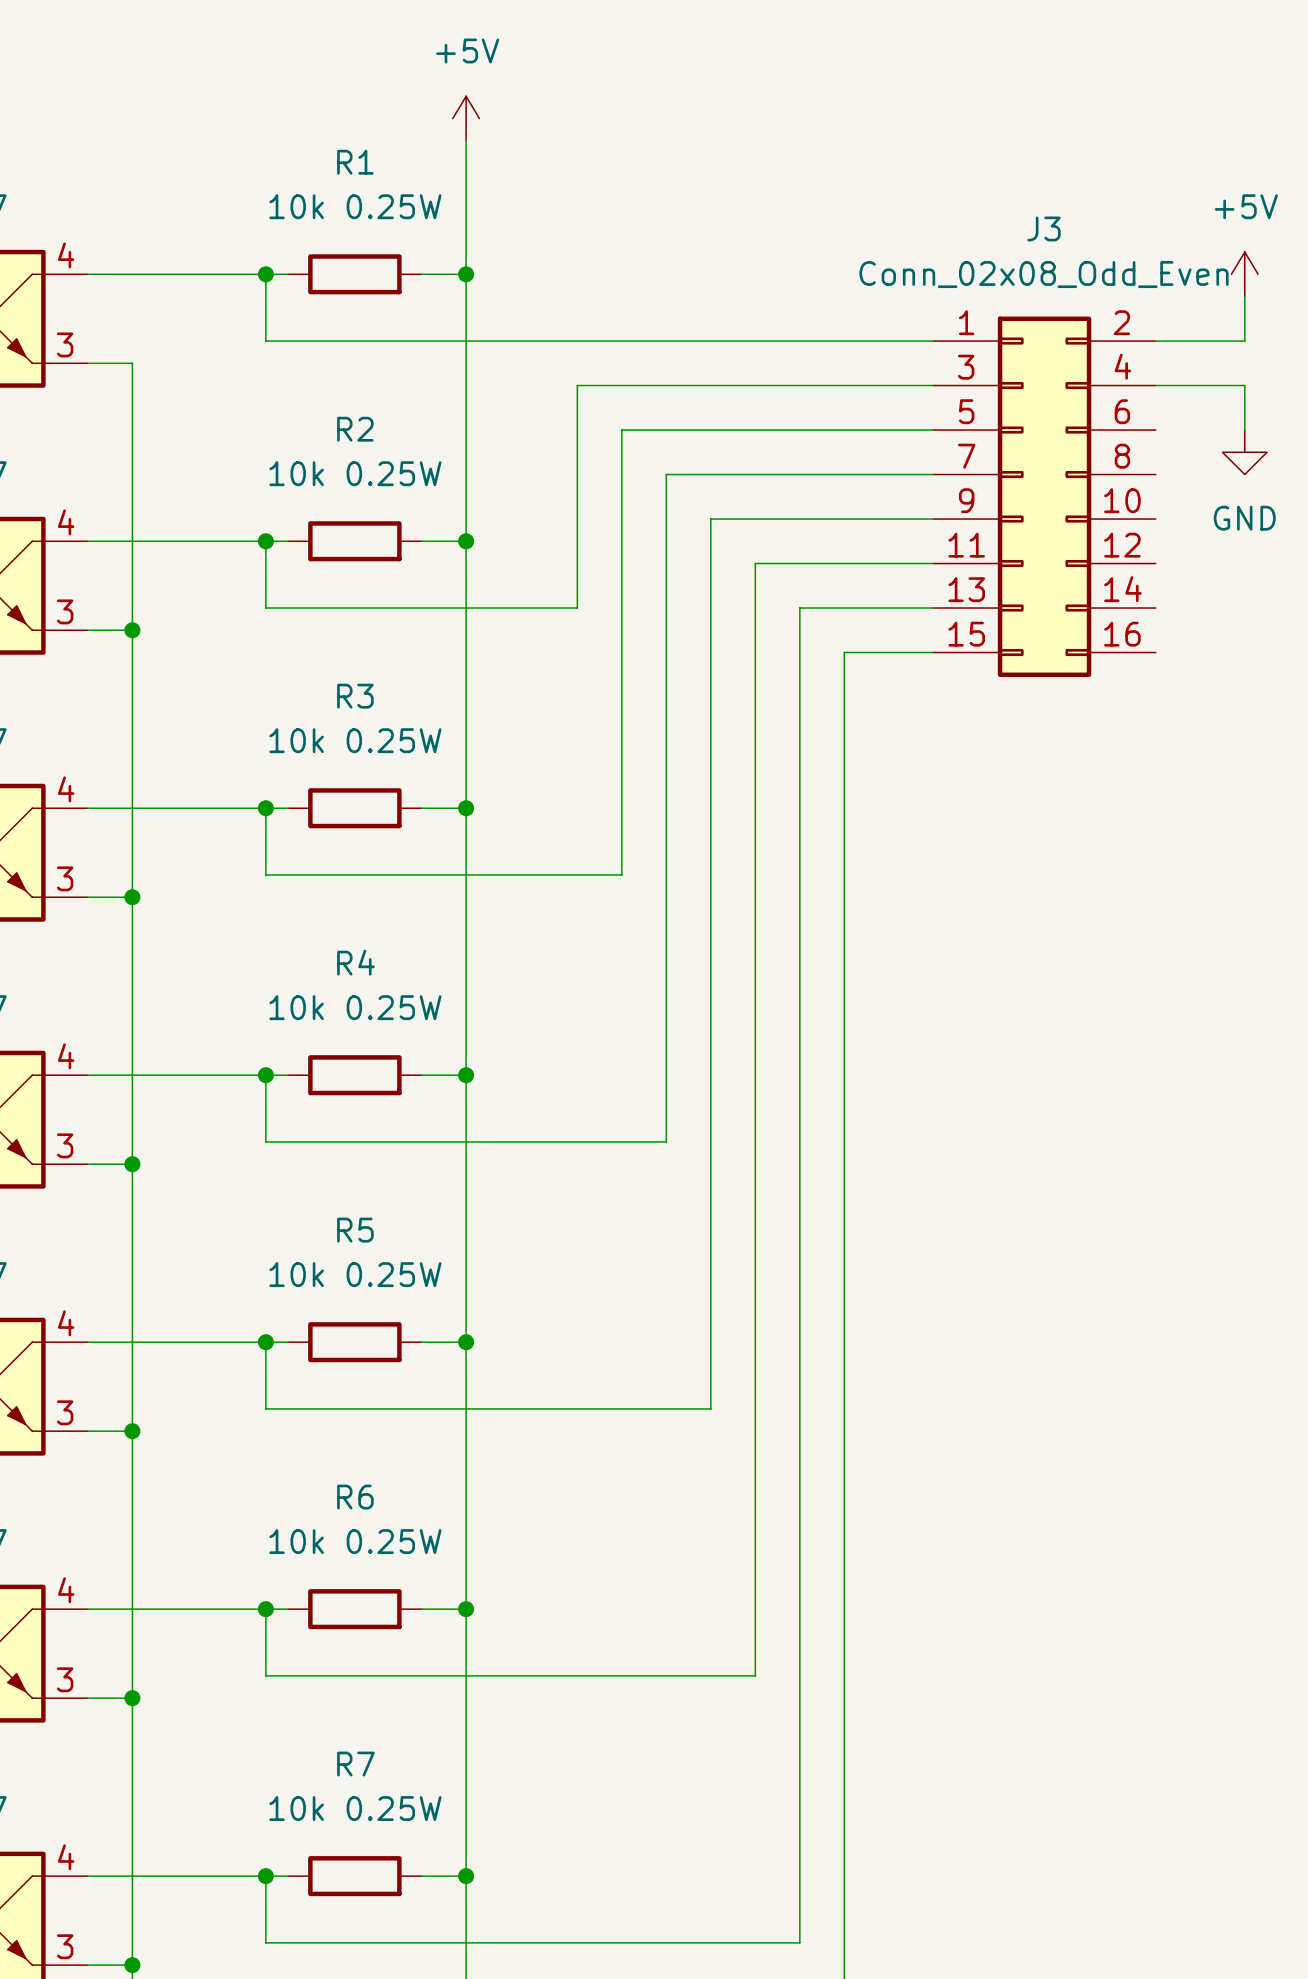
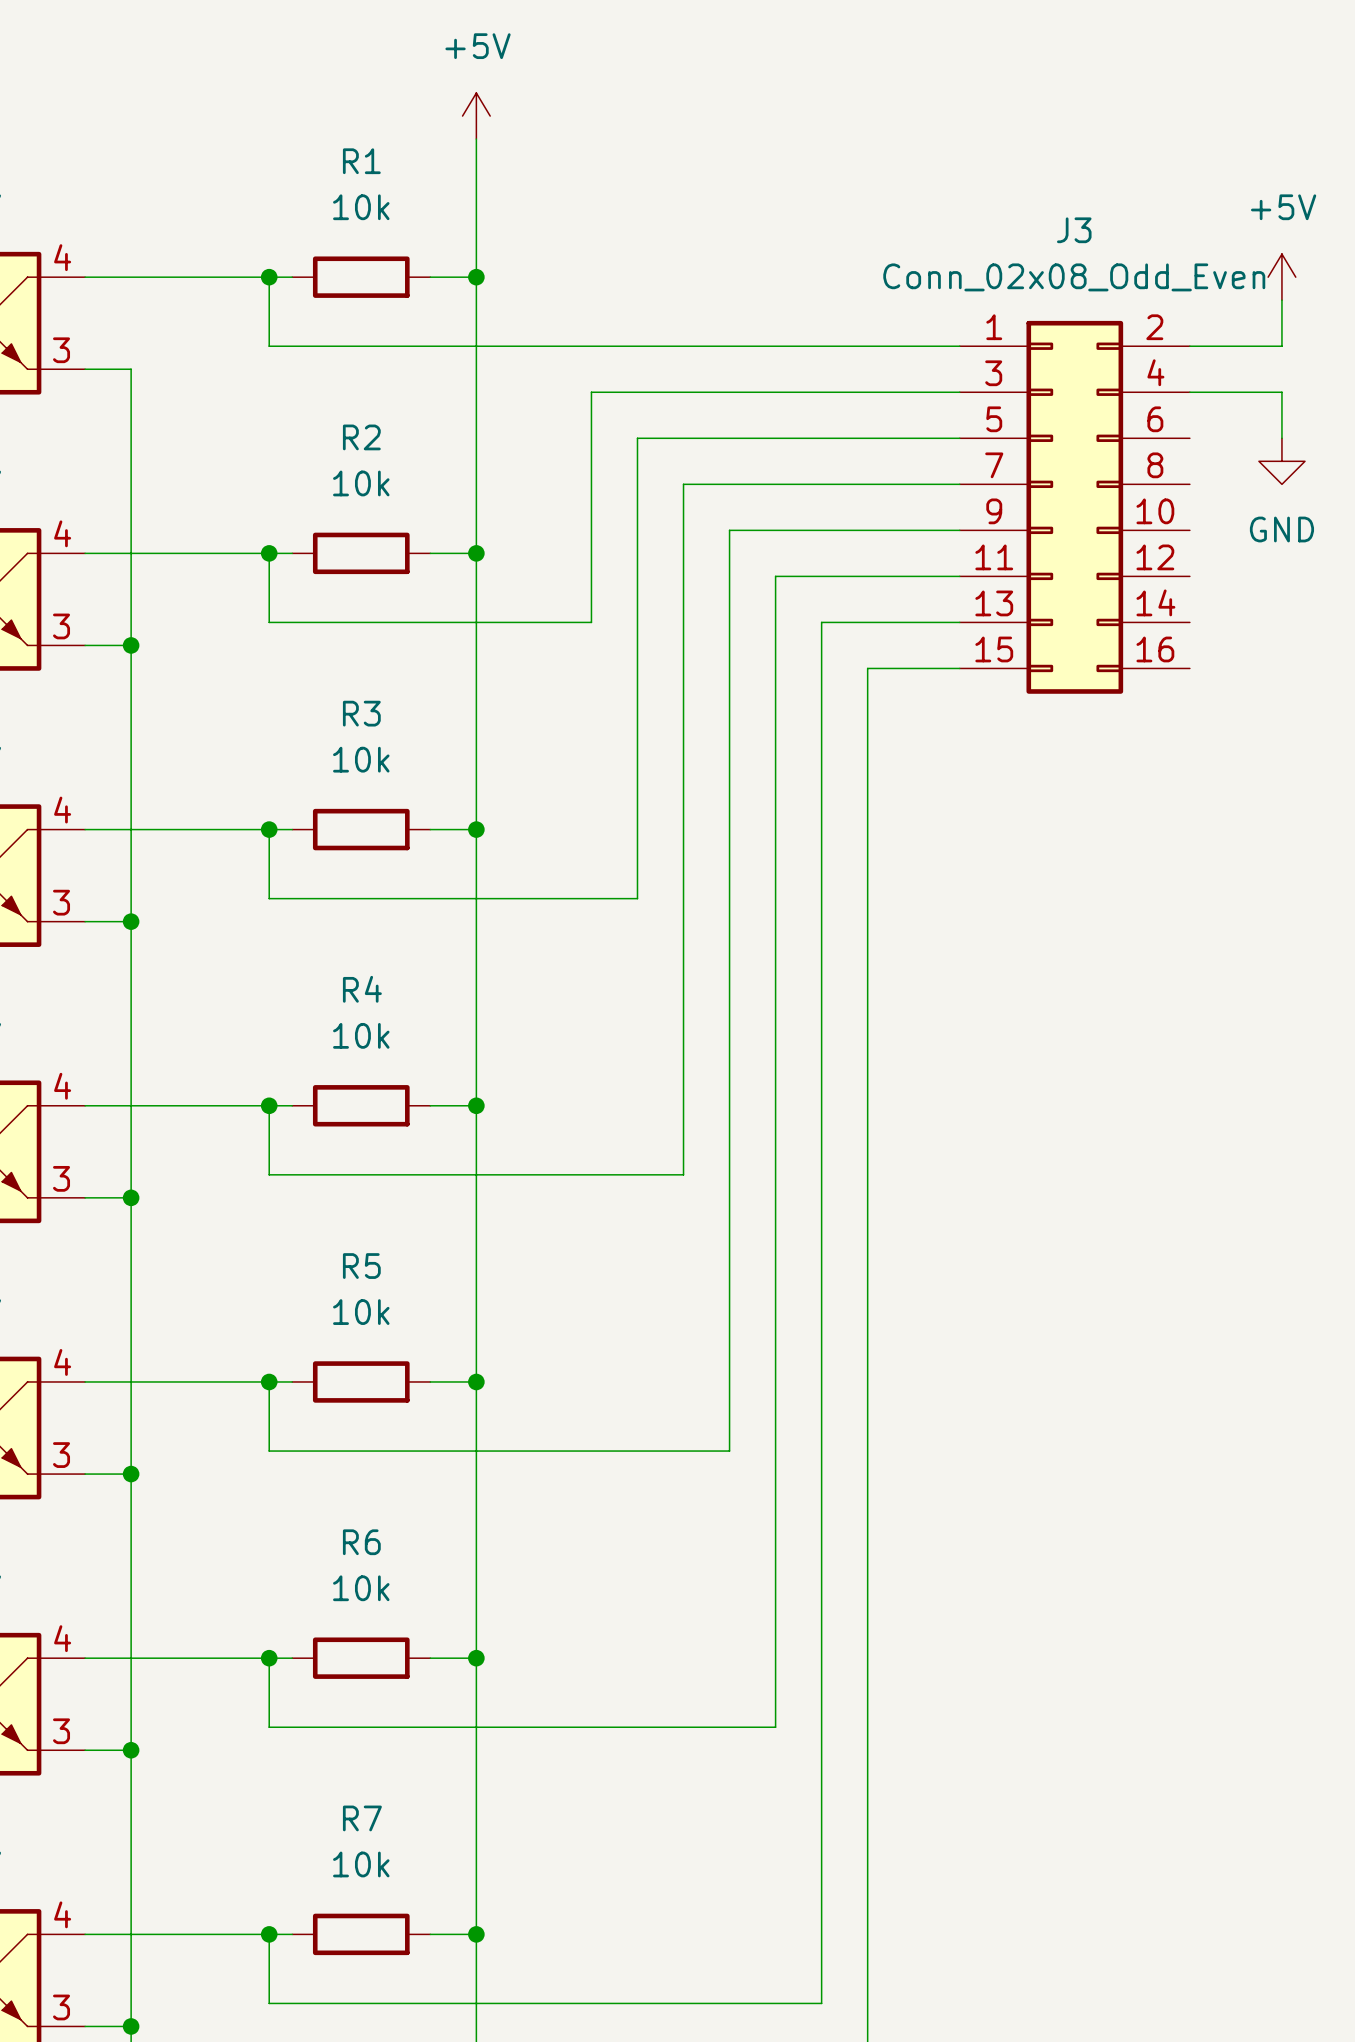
R1 value: 10k 0.25W (355, 206) -> 10k (361, 207)
R2 value: 10k 0.25W (355, 473) -> 10k (361, 483)
R3 value: 10k 0.25W (355, 740) -> 10k (361, 759)
R4 value: 10k 0.25W (355, 1007) -> 10k (361, 1035)
R5 value: 10k 0.25W (355, 1274) -> 10k (361, 1312)
R6 value: 10k 0.25W (355, 1541) -> 10k (361, 1588)
R7 value: 10k 0.25W (355, 1808) -> 10k (361, 1864)

